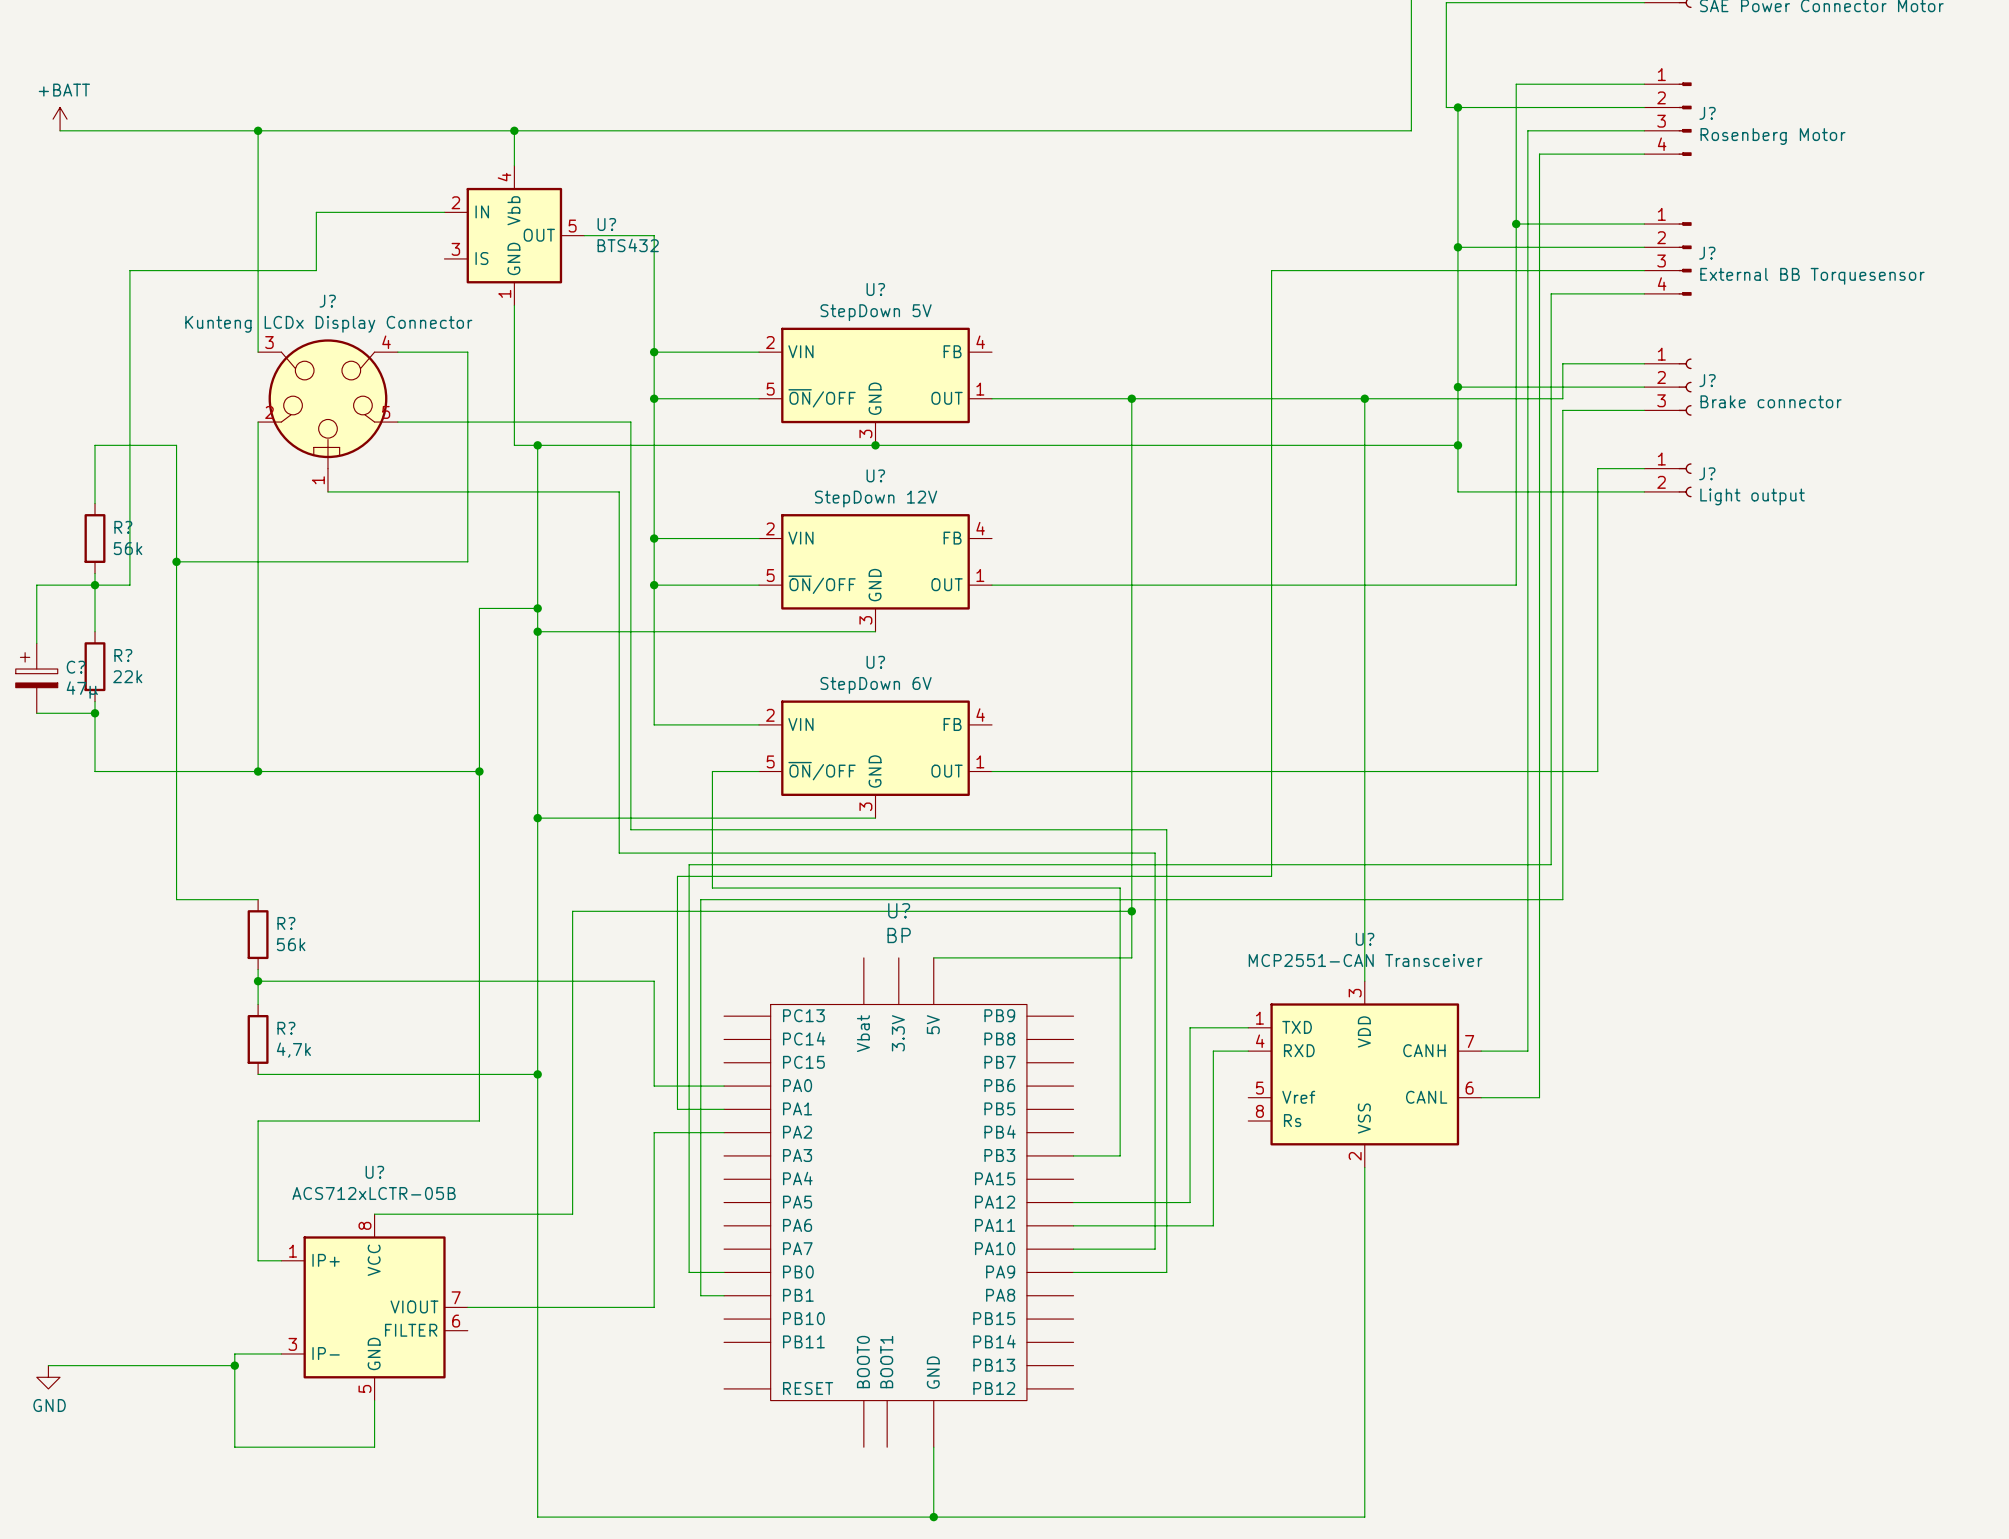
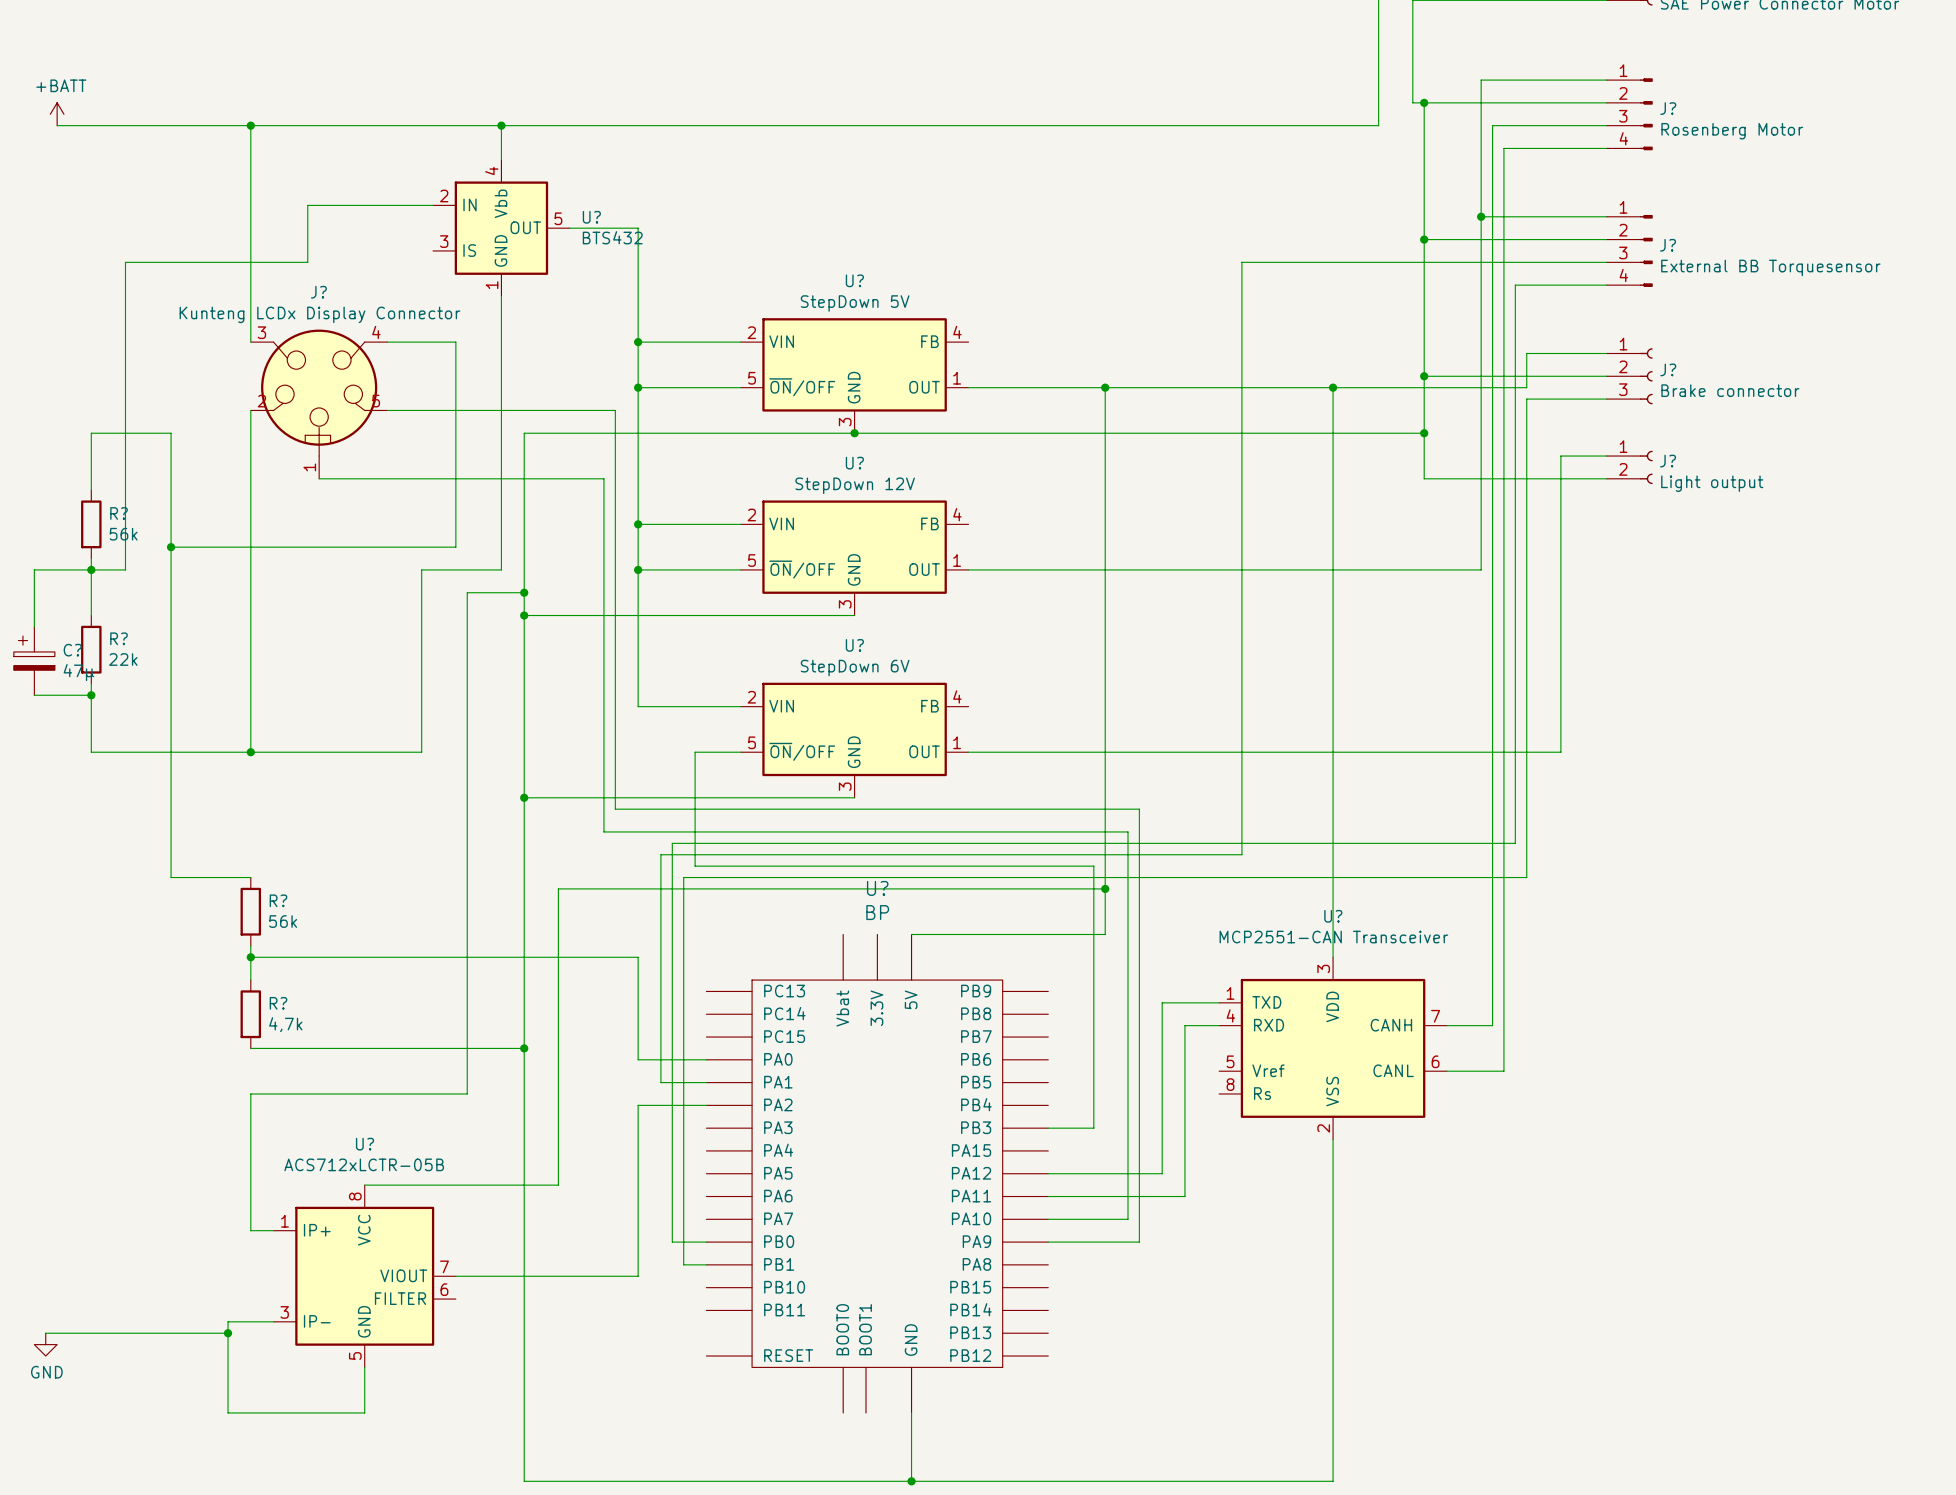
wire: (514, 445) (537, 445) -> none
junction: (537, 445) -> none
wire: (432, 771) (479, 771) -> (421, 752) (421, 569) (501, 569) (501, 433)
junction: (479, 771) -> none

